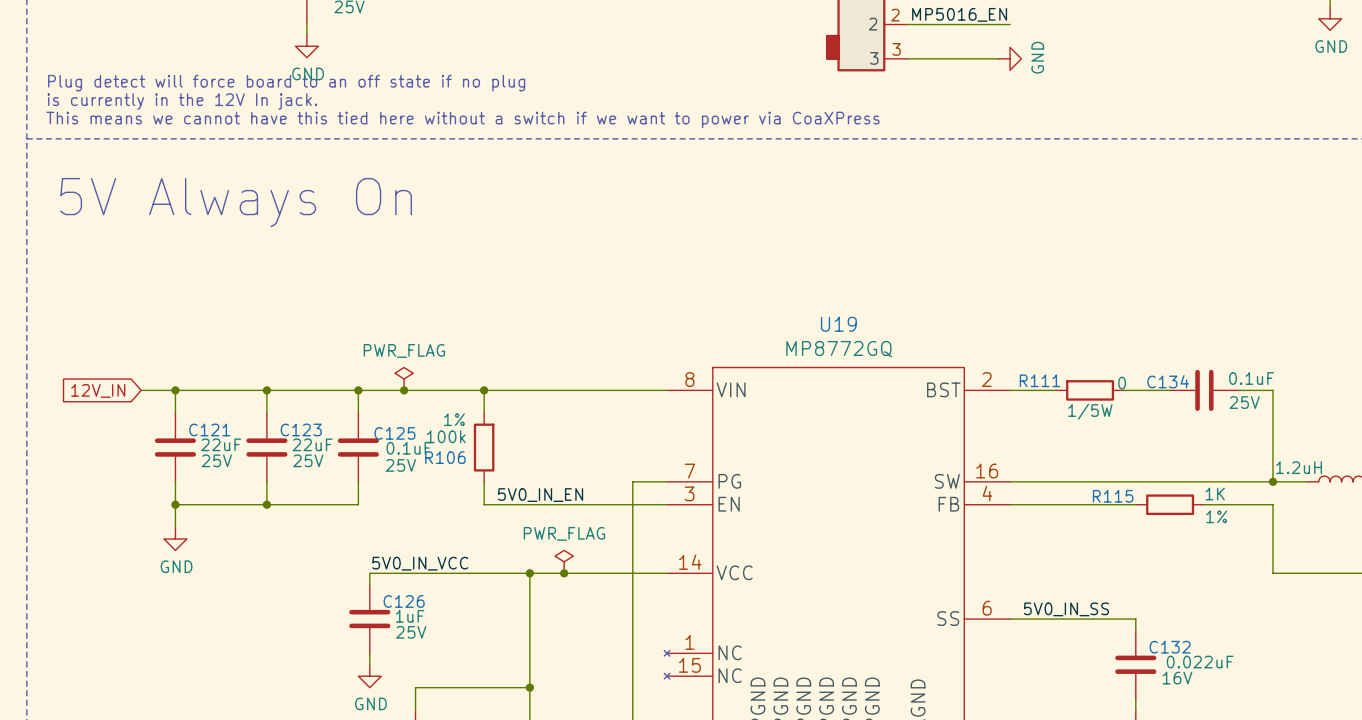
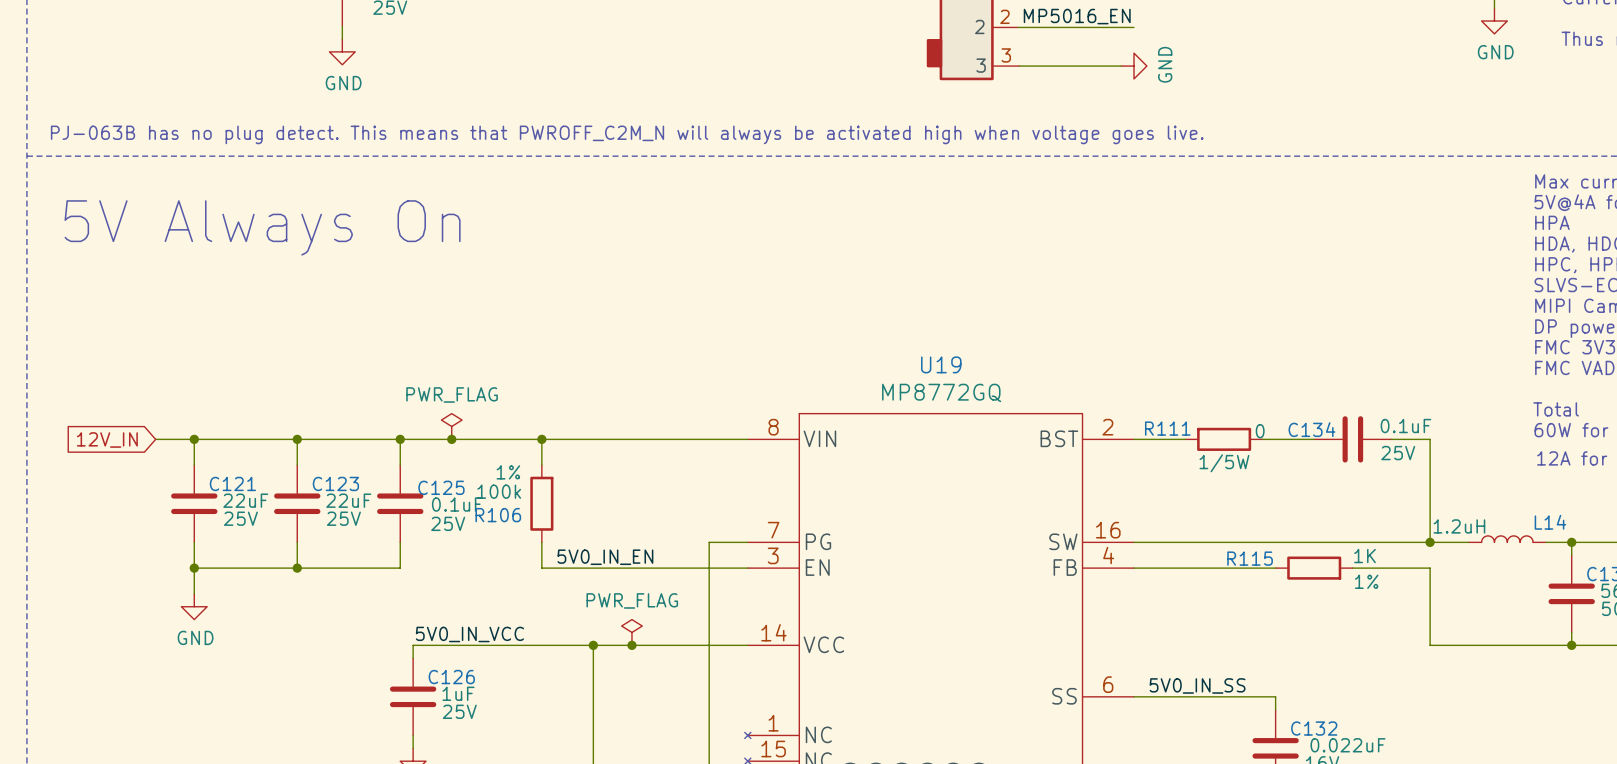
text: Plug detect will force board to an off state if no plug (286, 83) -> none
text: is currently in the 12V In jack. (182, 101) -> none
text: This means we cannot have this tied here without a switch if we want to power via CoaXPress (463, 119) -> PJ-063B has no plug detect. This means that PWROFF_C2M_N will always be activated high when voltage goes live. (627, 134)

